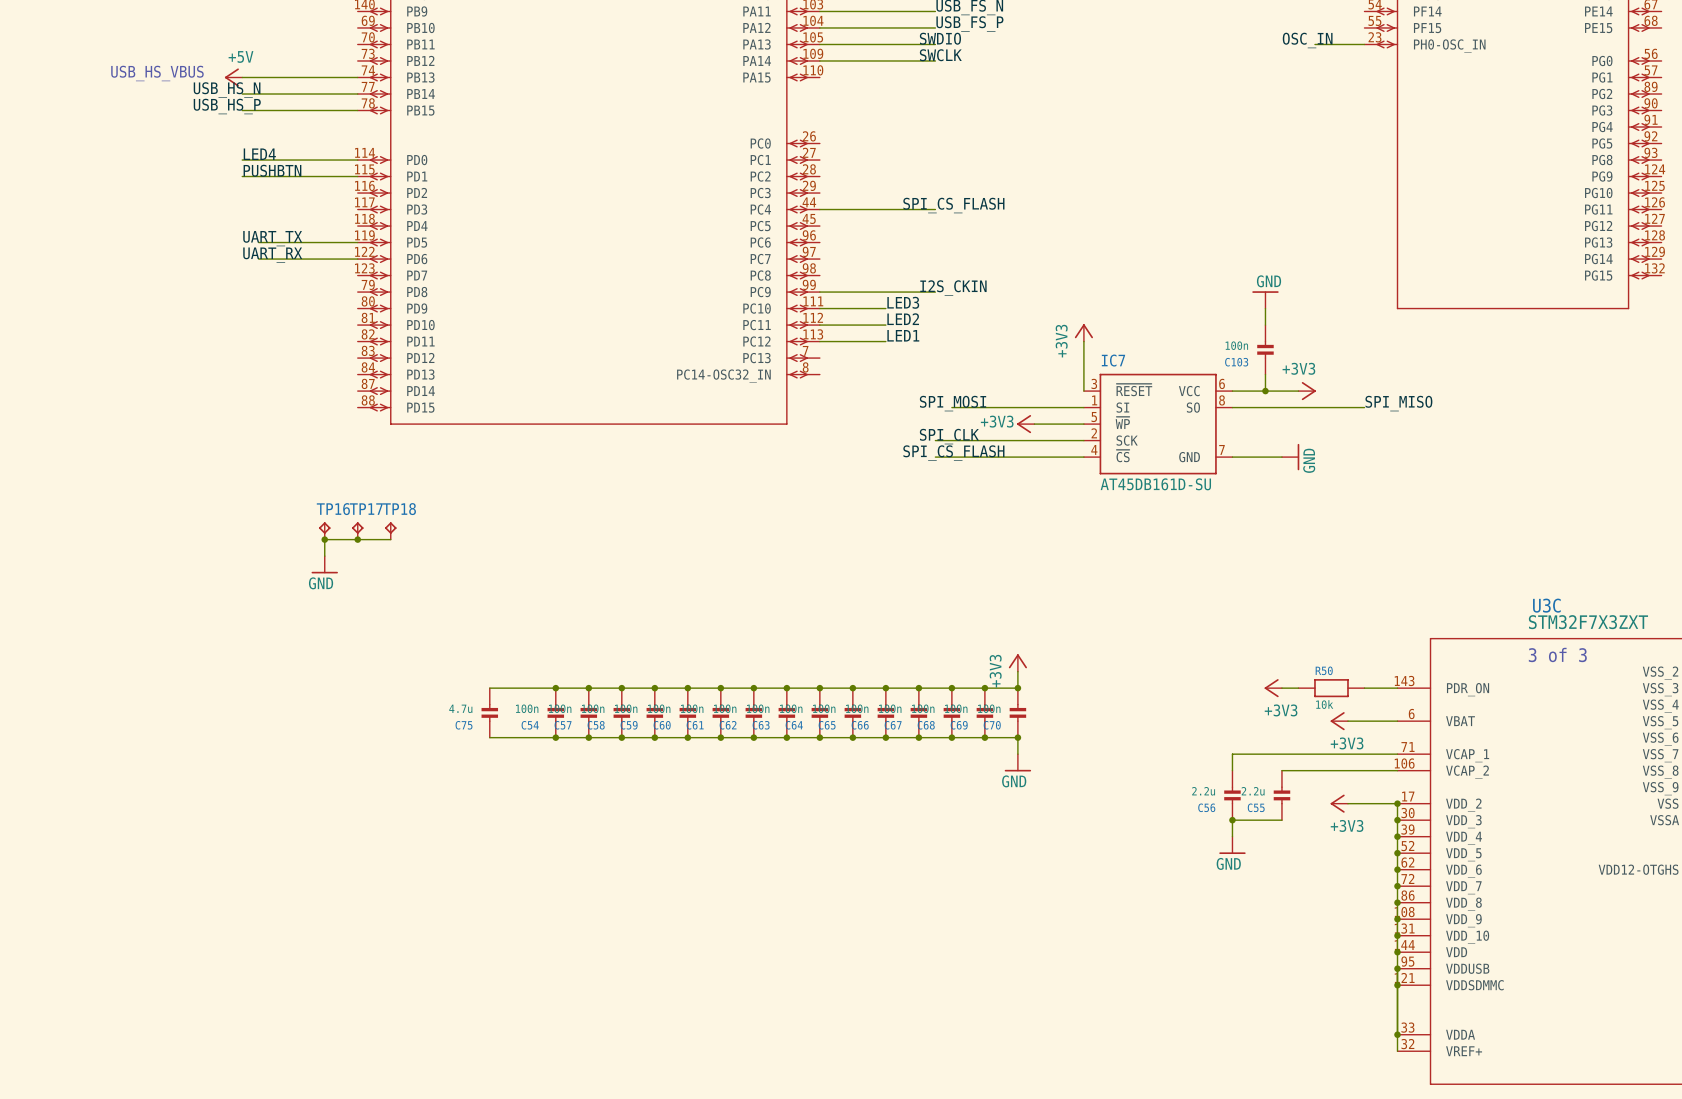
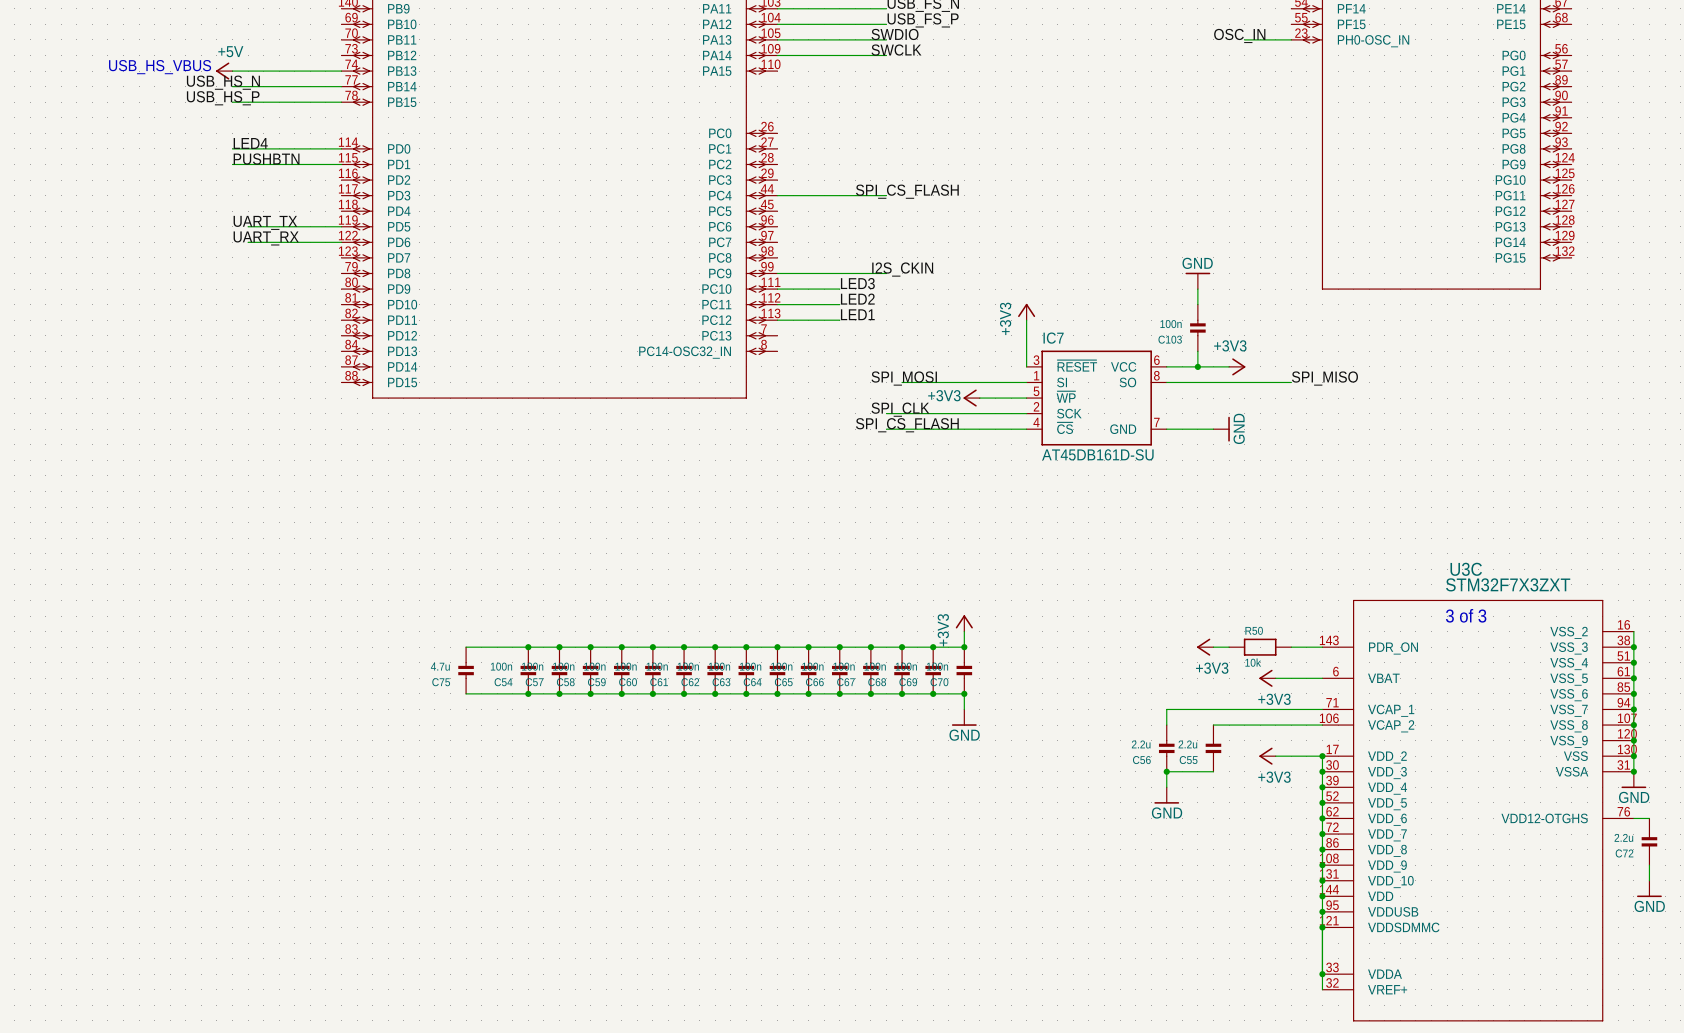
TP16: (324, 530) -> none
TP17: (357, 530) -> none
TP18: (390, 530) -> none
junction: (324, 539) -> none
junction: (357, 539) -> none
wire: (390, 539) (324, 539) (324, 556) -> none
power symbol: GND (324, 564) -> none

